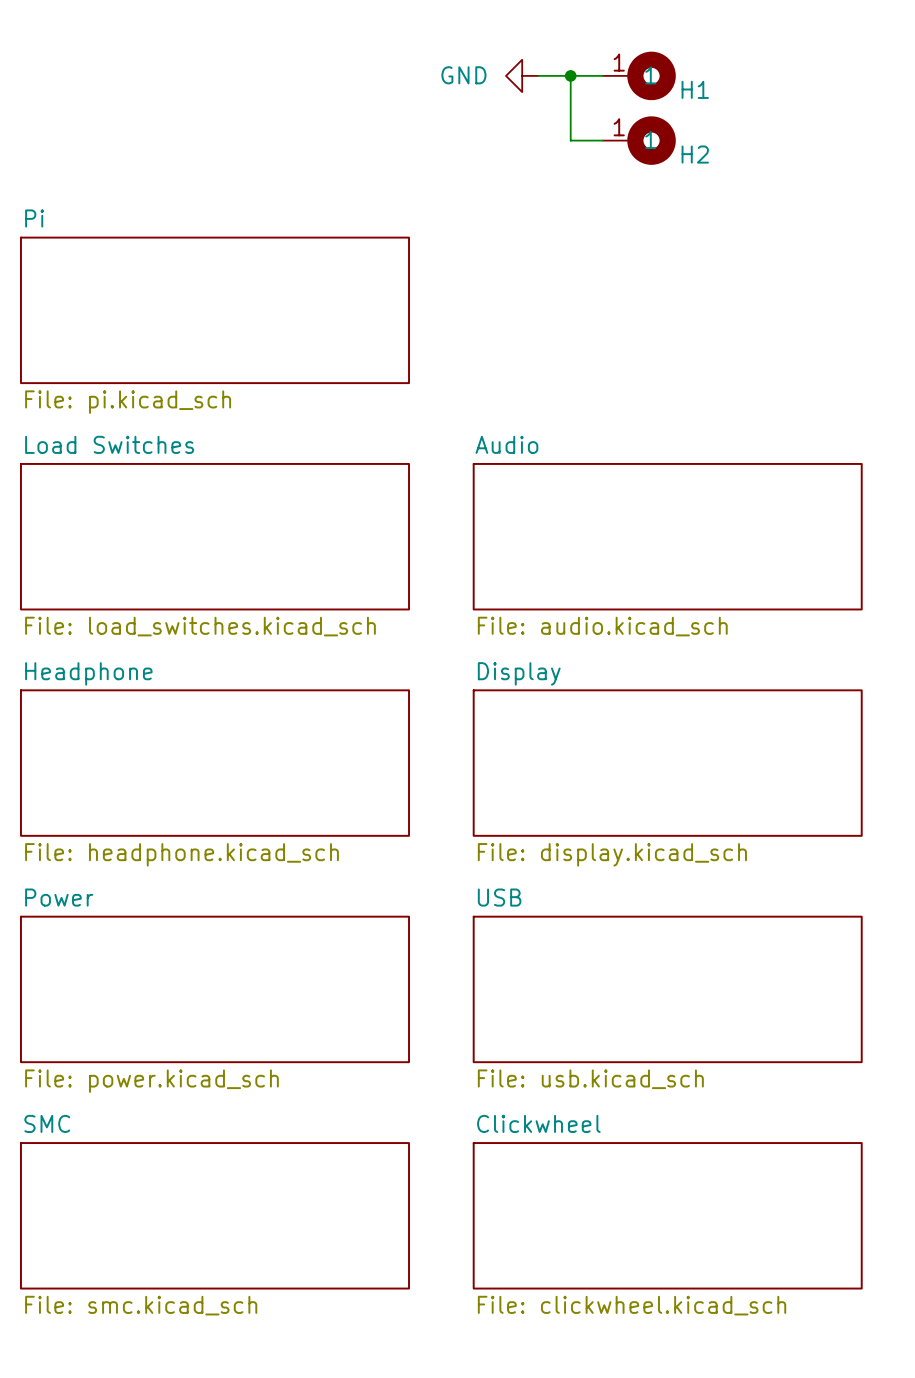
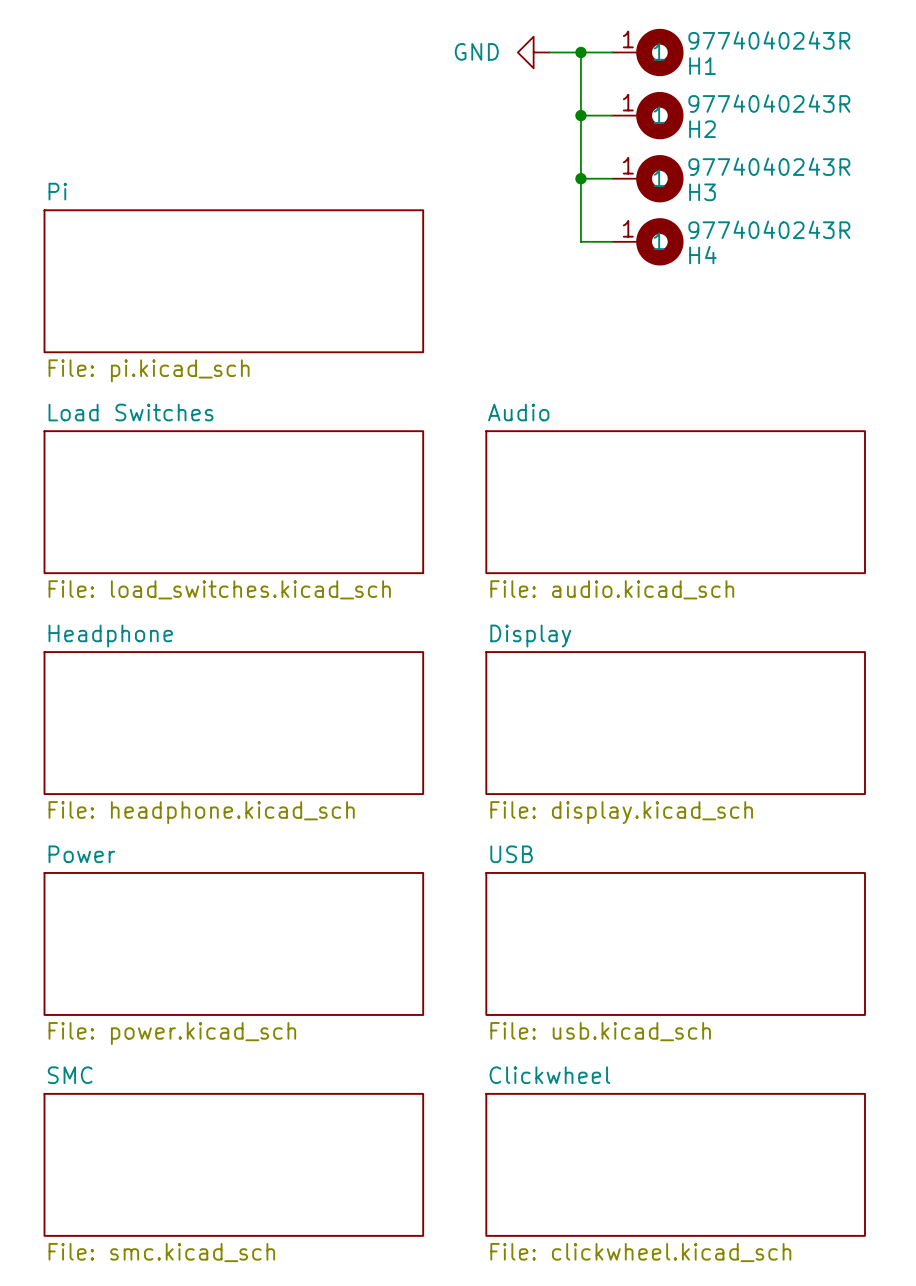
H1 value: none -> 9774040243R (769, 40)
H2 value: none -> 9774040243R (769, 103)
wire: none -> (580, 115) (580, 241) (612, 241)
junction: none -> (580, 115)
wire: none -> (580, 178) (612, 178)
junction: none -> (580, 178)
H3: none -> 9774040243R (648, 178)
H4: none -> 9774040243R (648, 241)

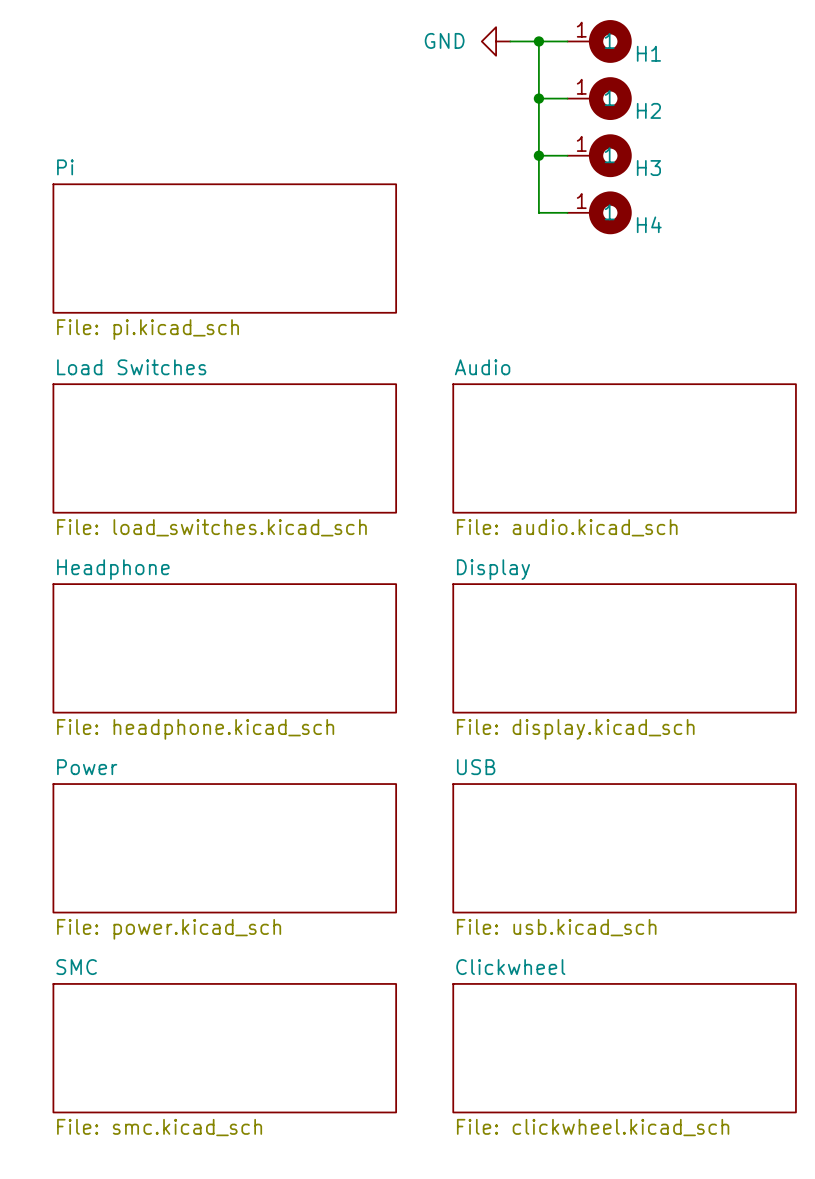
H1 value: 9774040243R (769, 40) -> none
H2 value: 9774040243R (769, 103) -> none
H3 value: 9774040243R (769, 166) -> none
H4 value: 9774040243R (769, 229) -> none

